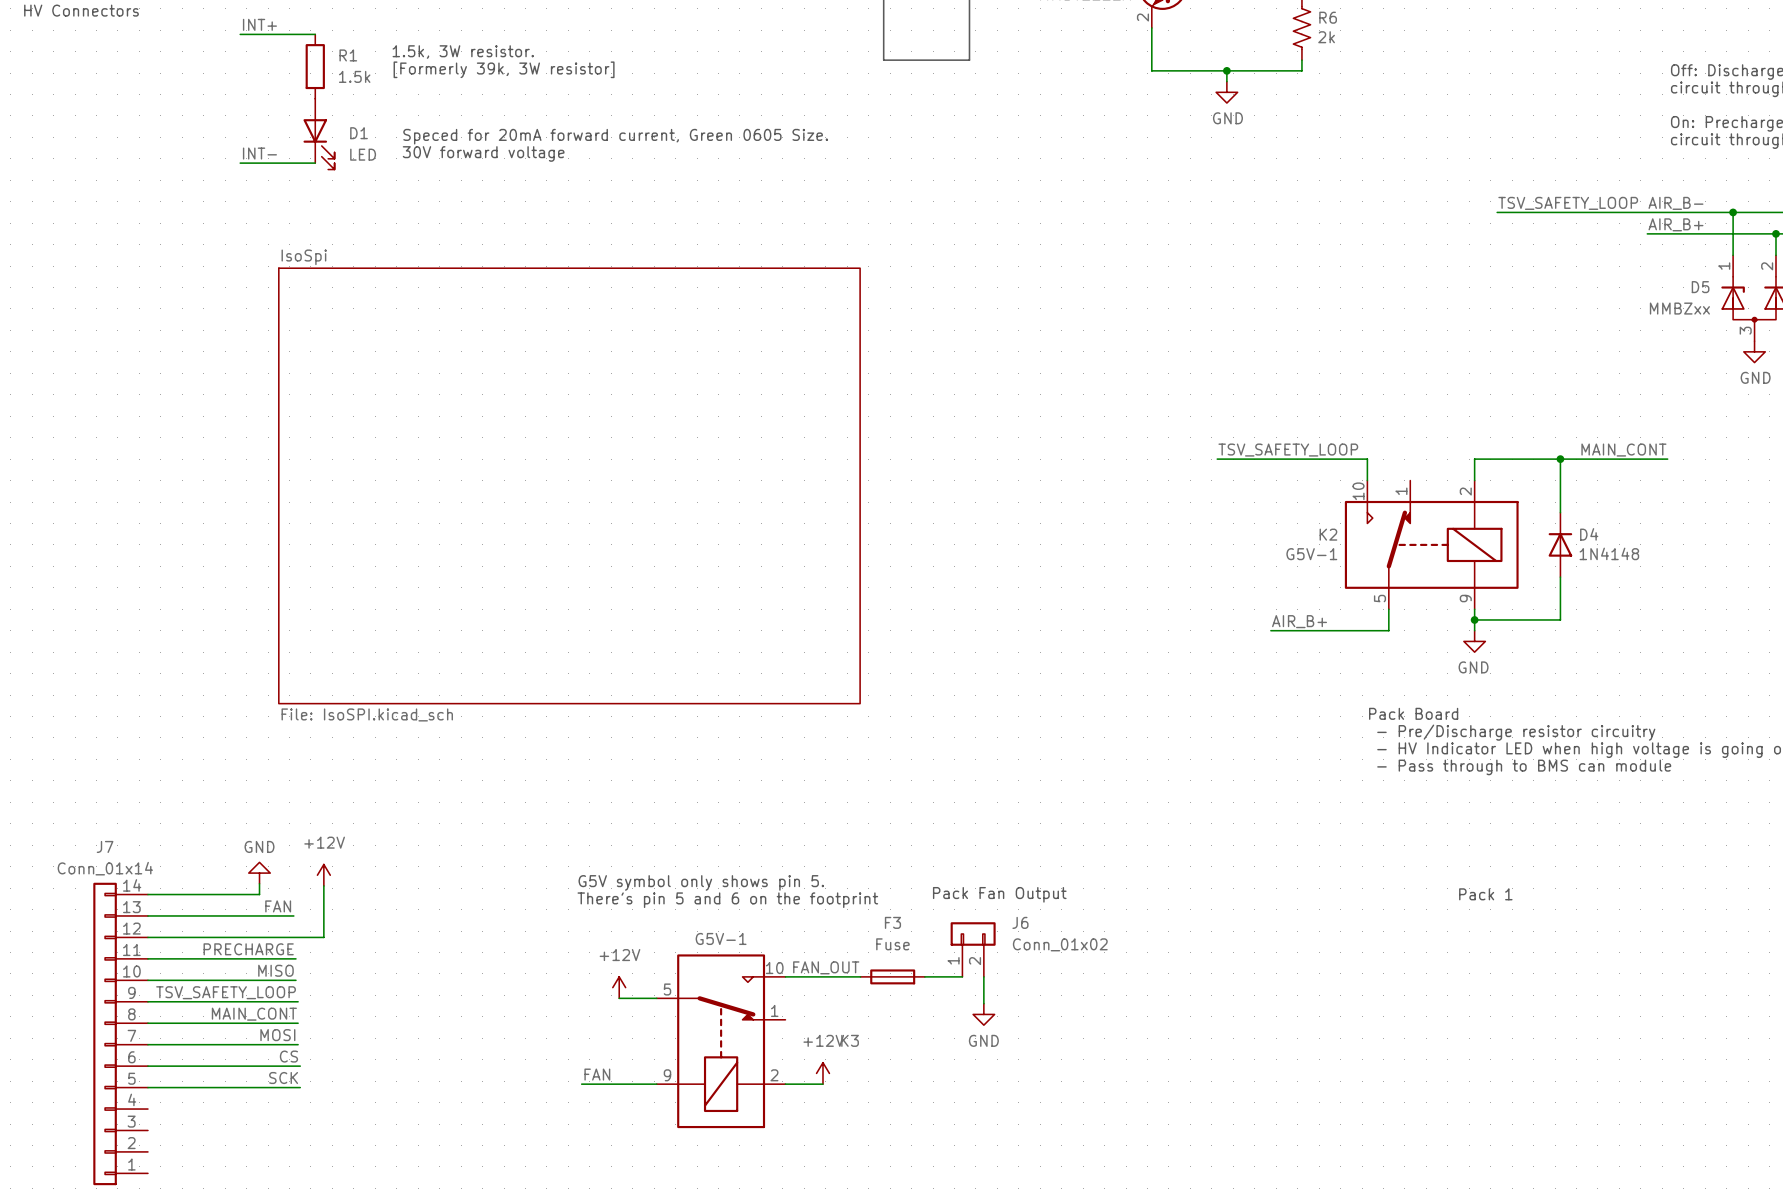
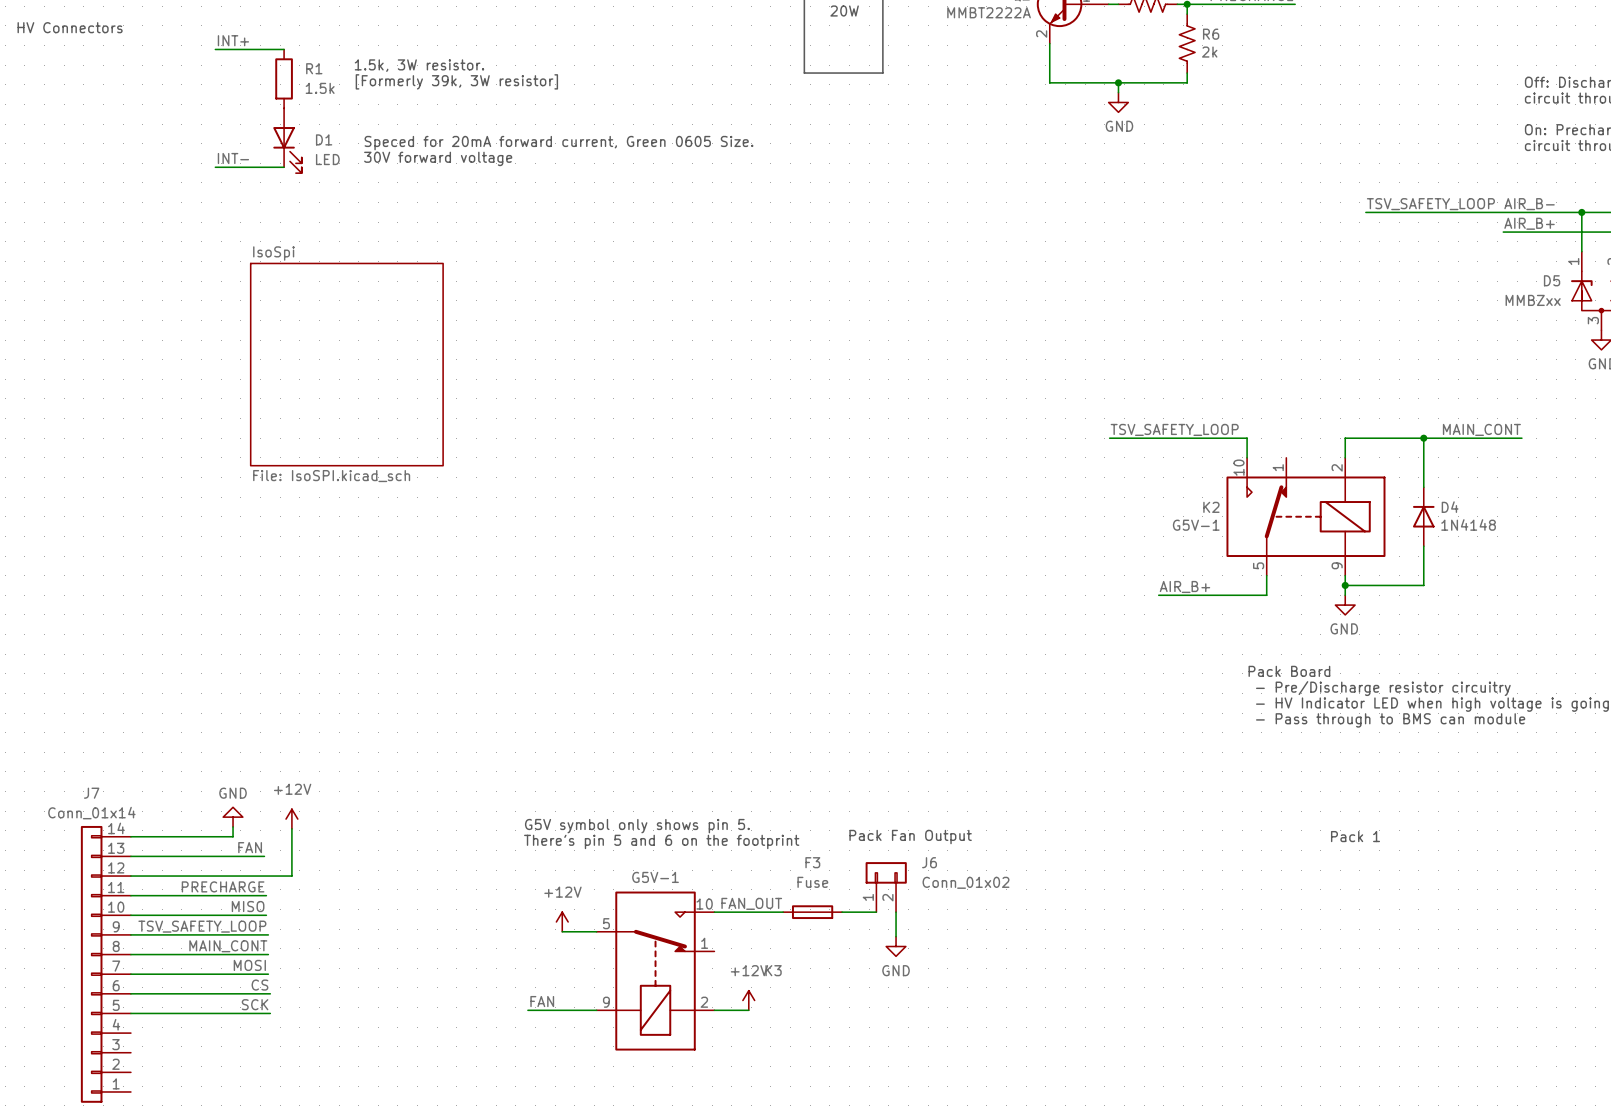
sheet IsoSpi: none -> File: IsoSPI.kicad_sch (346, 364)
sheet IsoSpi: File: IsoSPI.kicad_sch (569, 485) -> none

